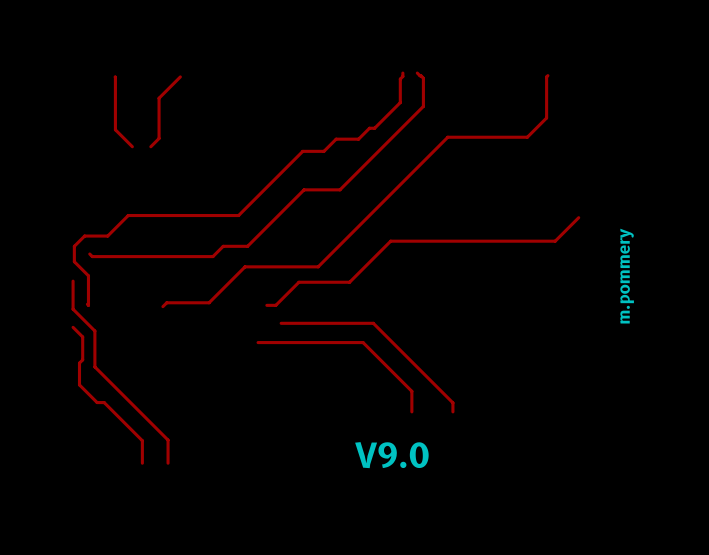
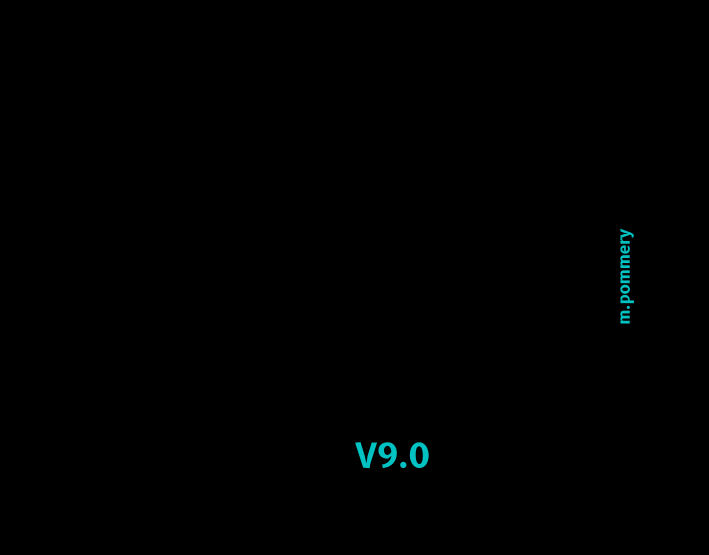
track: (402, 73) (400, 79) (400, 102) (374, 128) (369, 128) (358, 139) (336, 139) (323, 151) (302, 151) (238, 215) (128, 215) (107, 236) (84, 236) (74, 246) (74, 261) (88, 275) (87, 304) -> none
track: (417, 73) (423, 78) (423, 106) (340, 189) (304, 189) (247, 246) (223, 246) (212, 256) (92, 256) (89, 254) -> none
track: (547, 75) (546, 117) (527, 137) (447, 137) (318, 266) (245, 266) (209, 302) (166, 302) (162, 306) -> none
track: (180, 76) (159, 98) (159, 138) (150, 146) -> none
track: (115, 77) (115, 129) (132, 146) -> none
track: (578, 217) (555, 241) (390, 241) (349, 282) (298, 282) (275, 305) (266, 305) -> none
track: (73, 281) (73, 309) (94, 331) (94, 366) (168, 440) (168, 463) -> none
track: (281, 323) (373, 323) (452, 402) (452, 411) -> none
track: (73, 327) (82, 336) (82, 359) (79, 363) (79, 384) (97, 402) (104, 402) (142, 440) (142, 463) -> none
track: (258, 342) (363, 342) (411, 391) (411, 411) -> none

